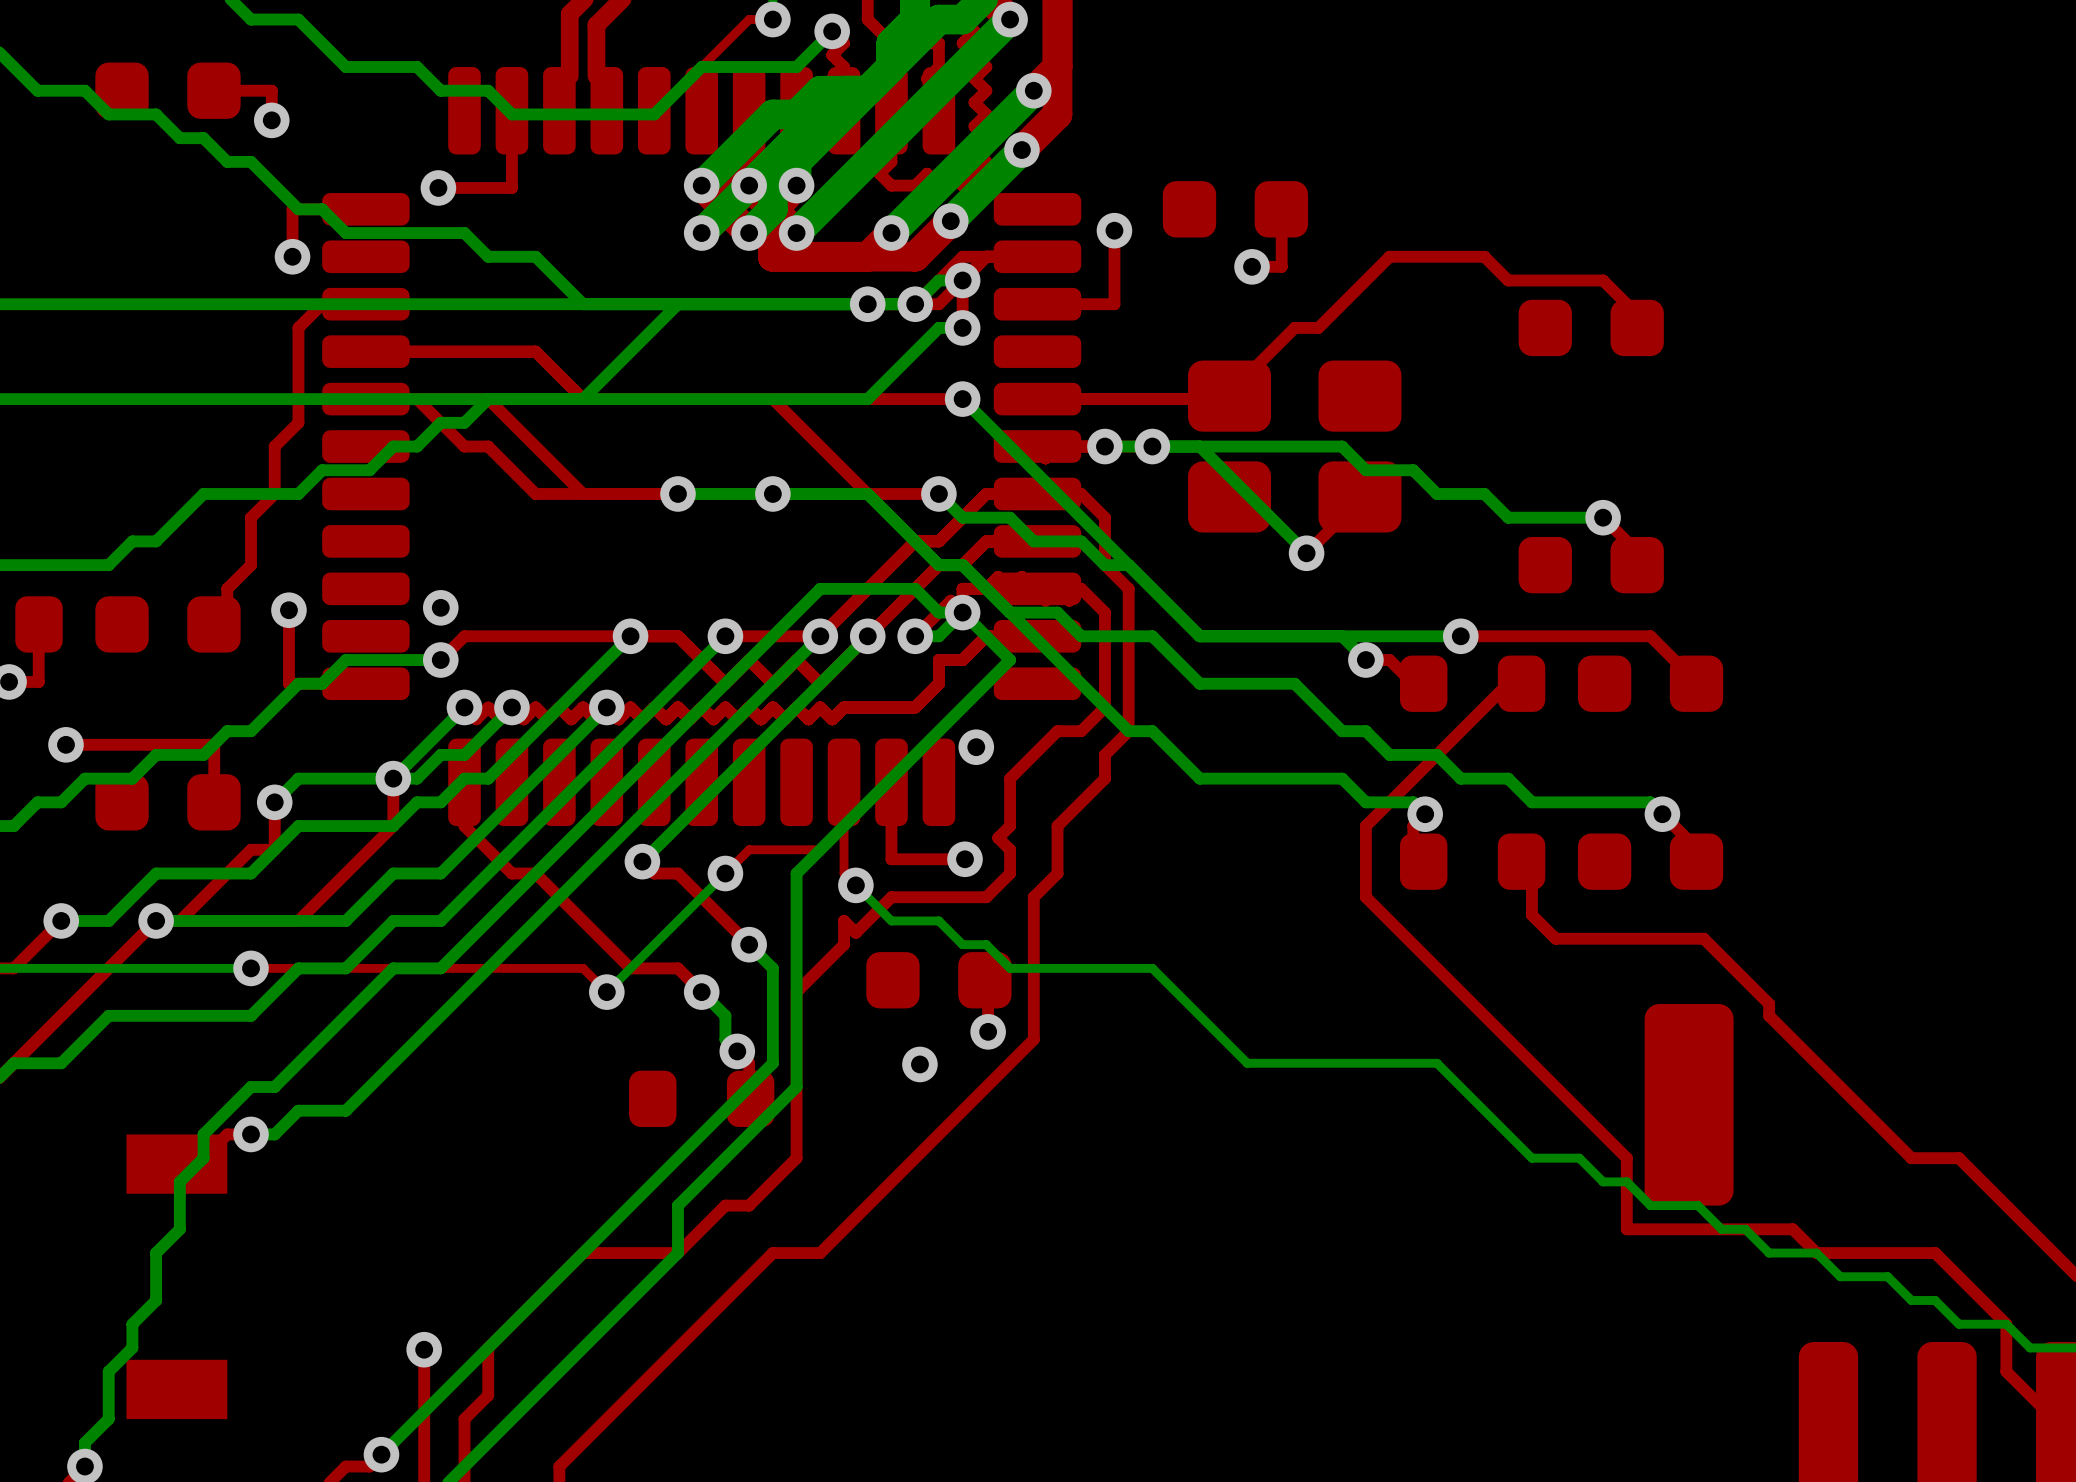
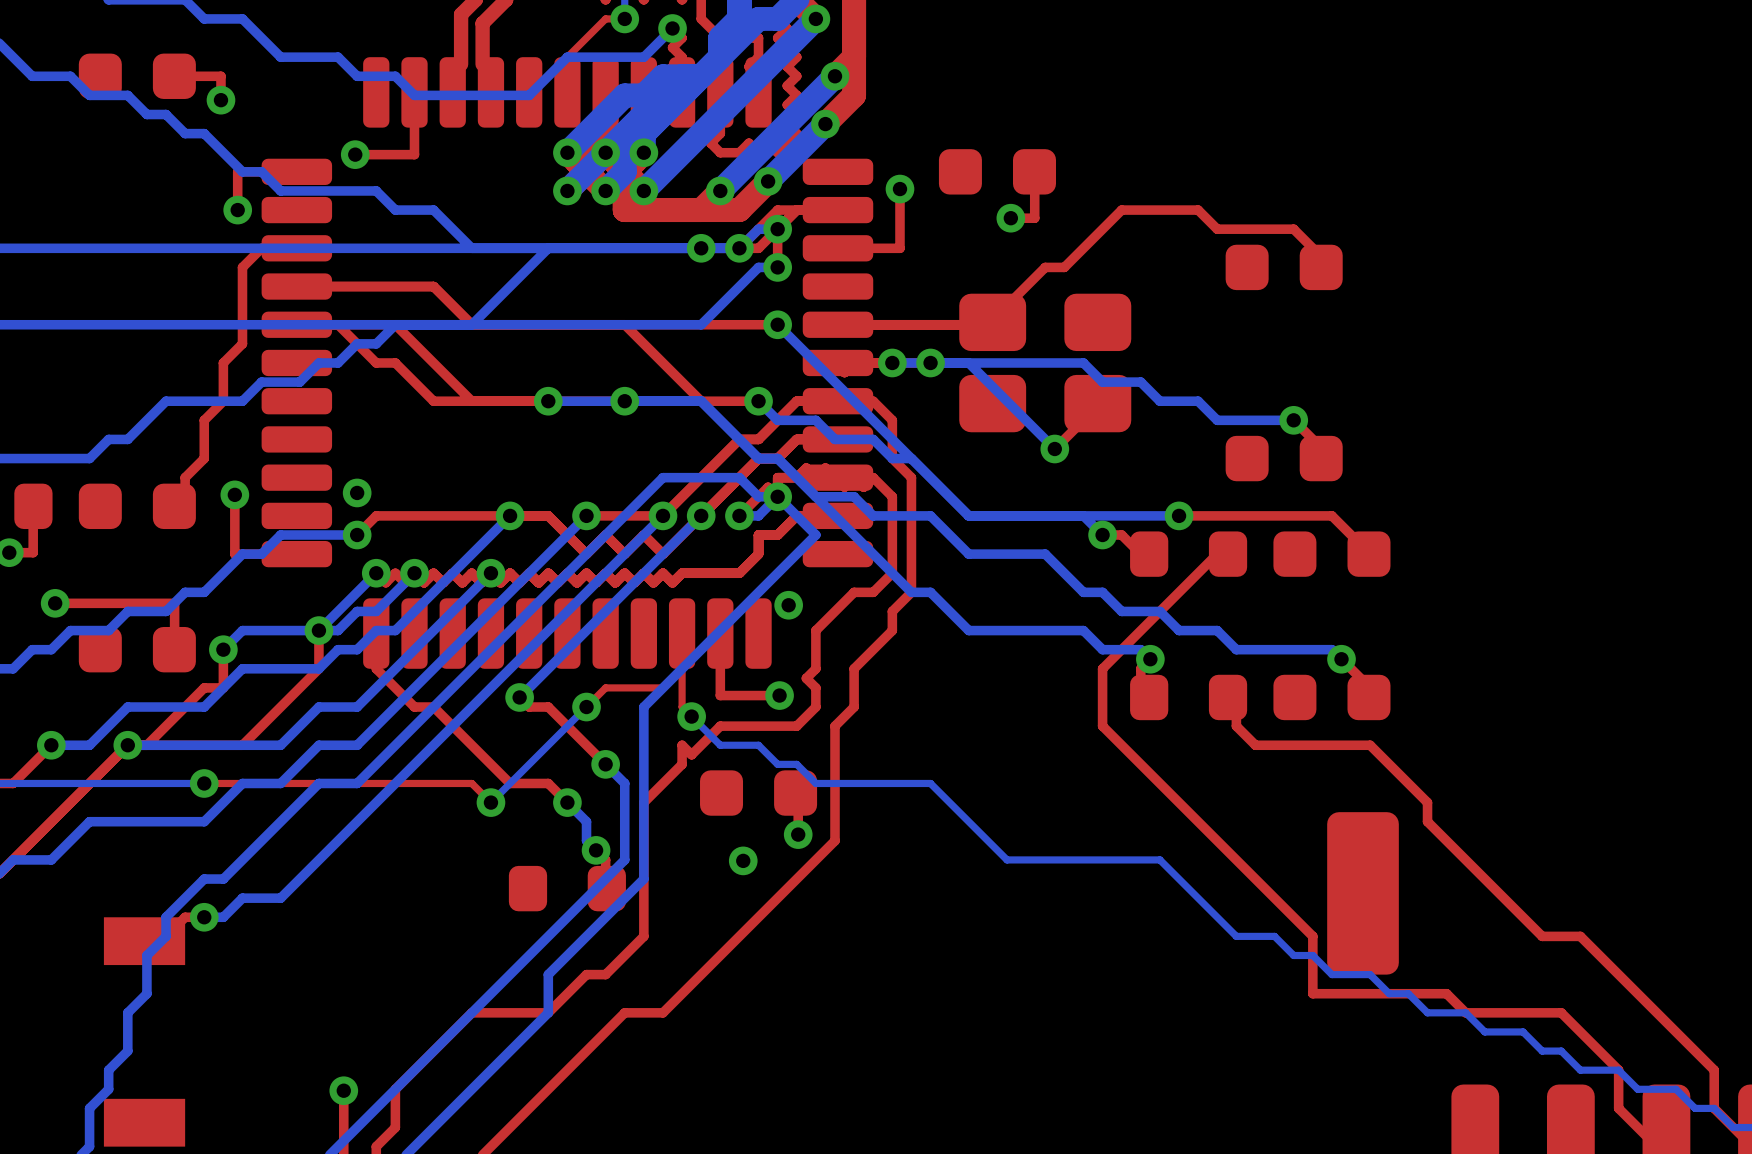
top track: (1531, 897) (1531, 915) (1555, 938) (1703, 938) (1769, 1003) -> (1236, 726) (1255, 745) (1370, 745) (1427, 802) (1427, 812)

